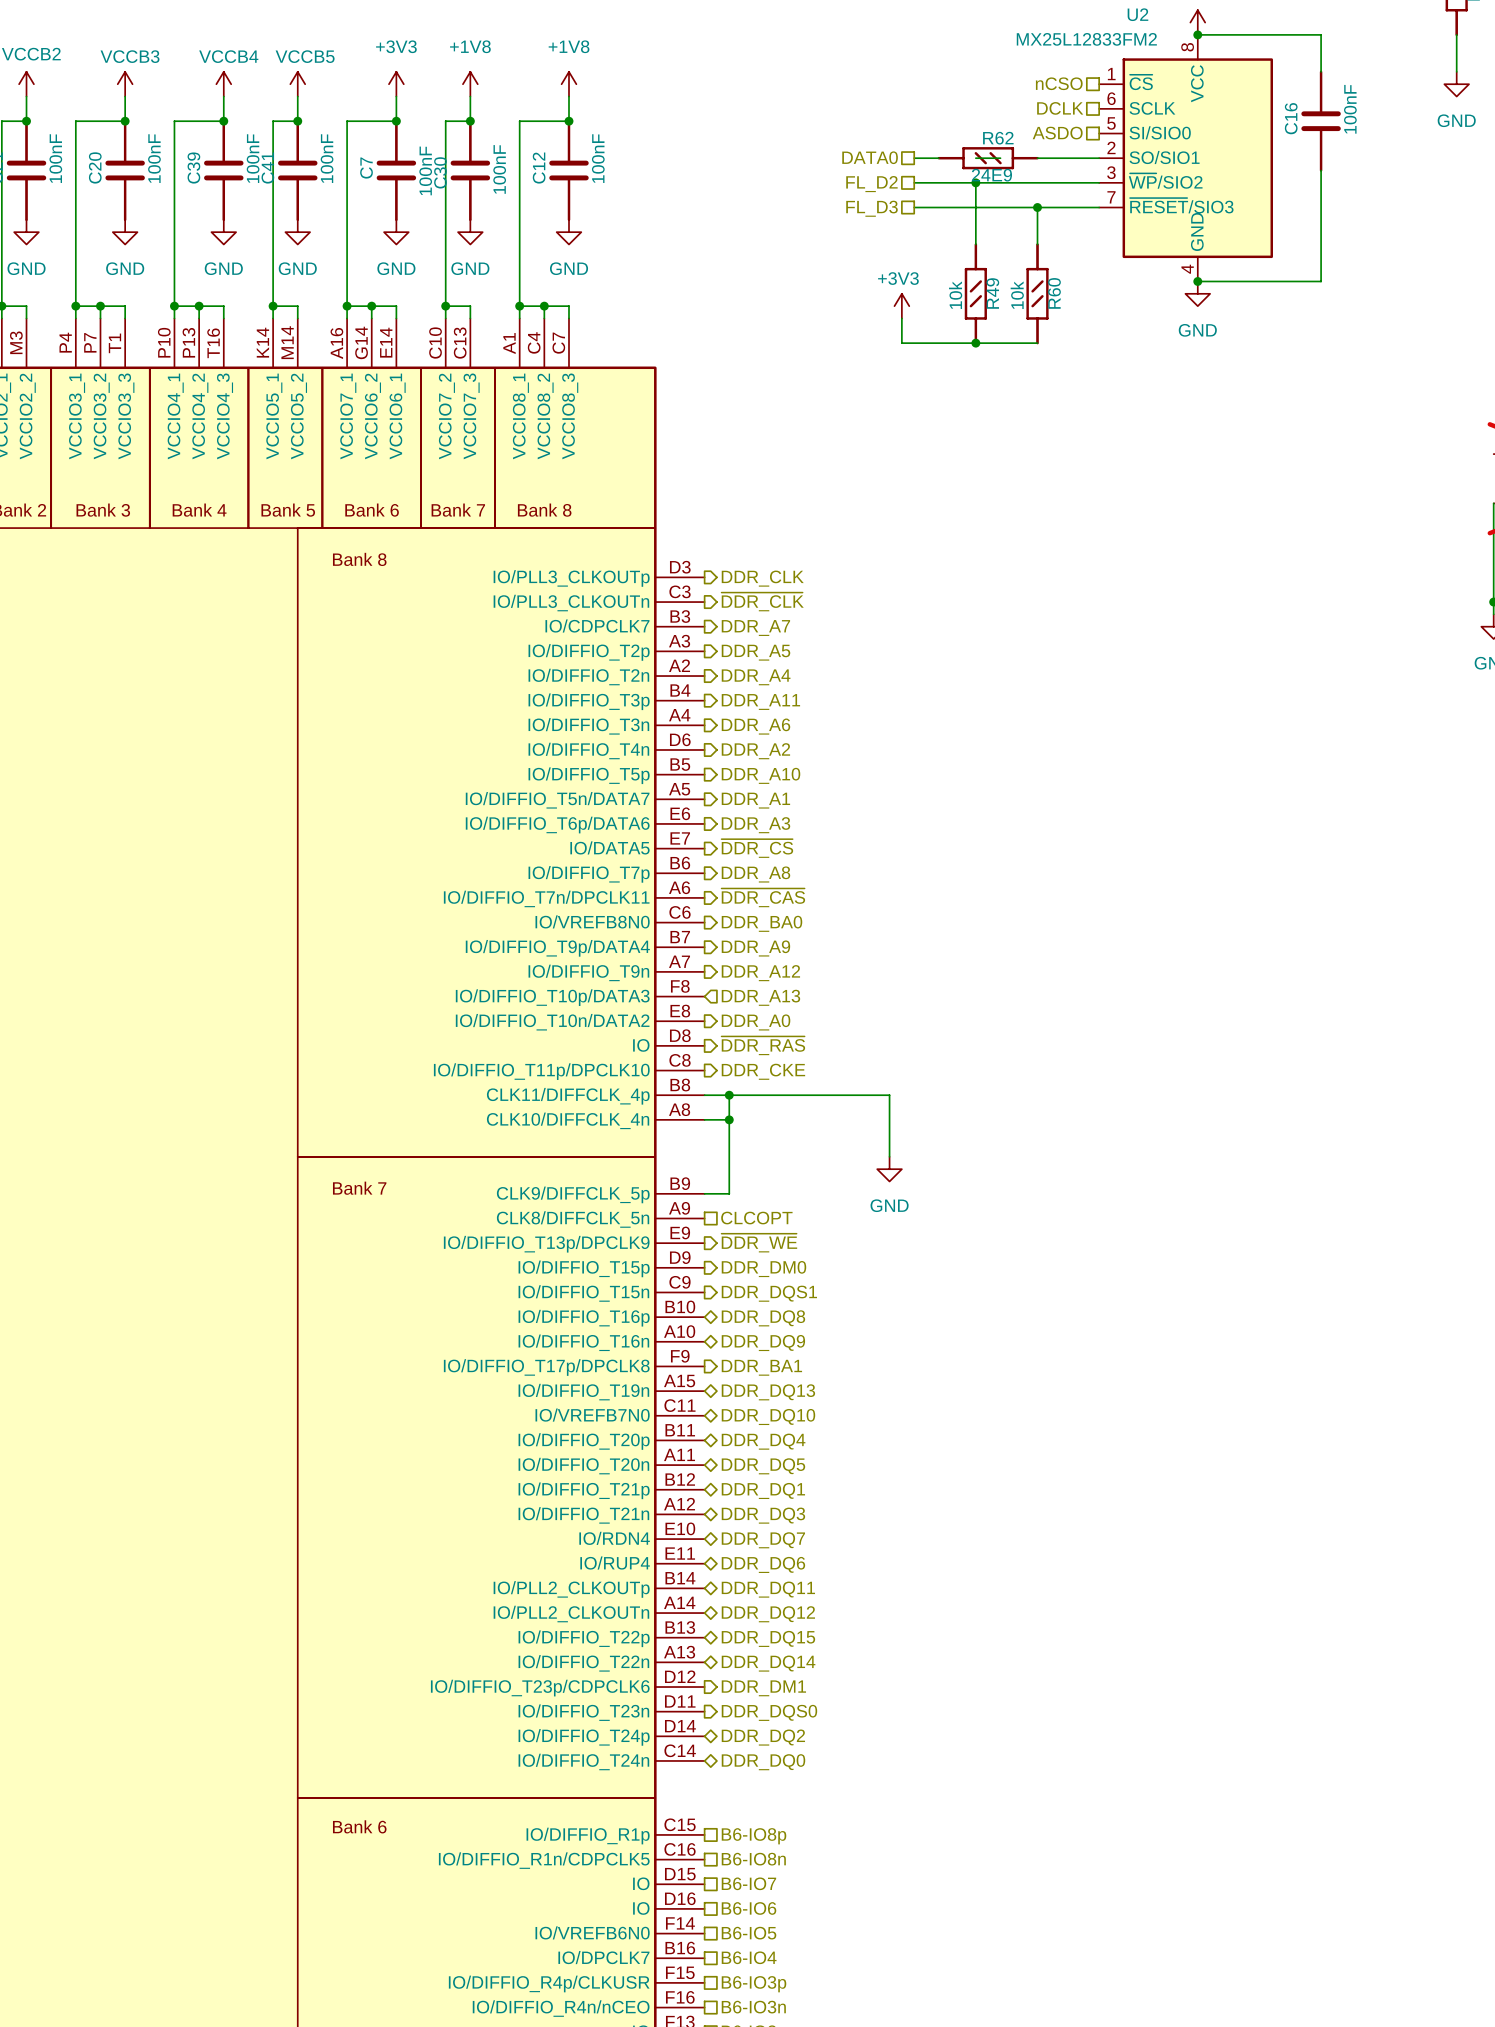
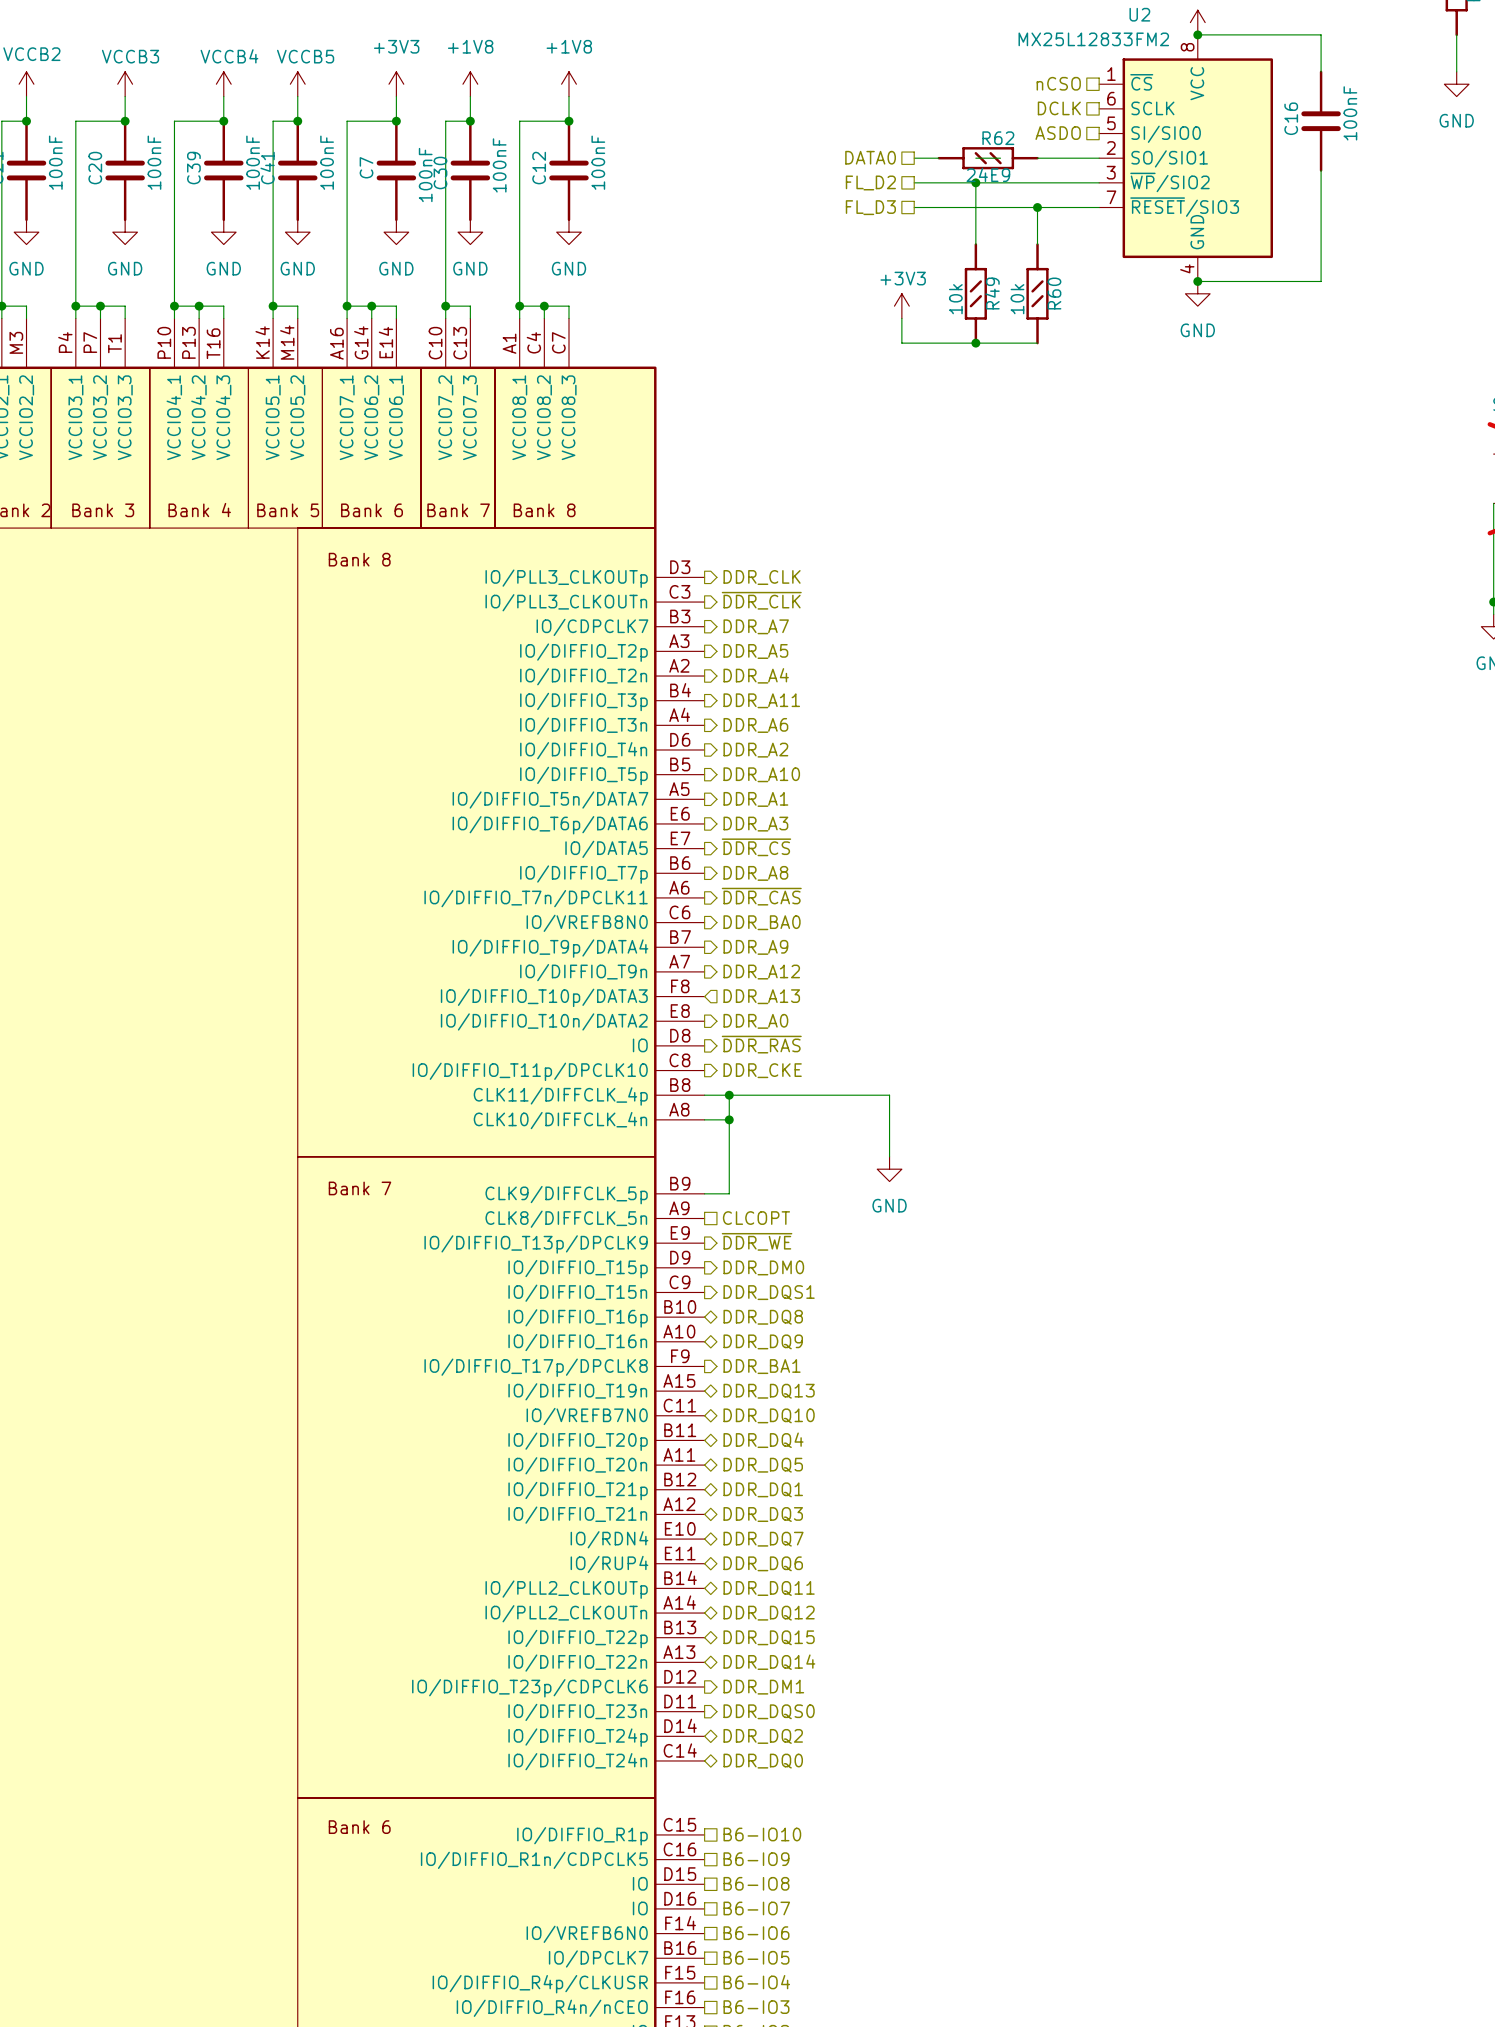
hierarchical label: B6-IO8p (754, 1836) -> B6-IO10 (762, 1834)
hierarchical label: B6-IO8n (753, 1859) -> B6-IO9 (756, 1859)
hierarchical label: B6-IO7 (748, 1883) -> B6-IO8 (756, 1883)
hierarchical label: B6-IO6 (749, 1908) -> B6-IO7 (756, 1908)
hierarchical label: B6-IO5 (749, 1933) -> B6-IO6 (756, 1933)
hierarchical label: B6-IO4 (749, 1957) -> B6-IO5 (756, 1957)
hierarchical label: B6-IO3p (754, 1984) -> B6-IO4 (756, 1982)
hierarchical label: B6-IO3n (753, 2007) -> B6-IO3 (756, 2007)

